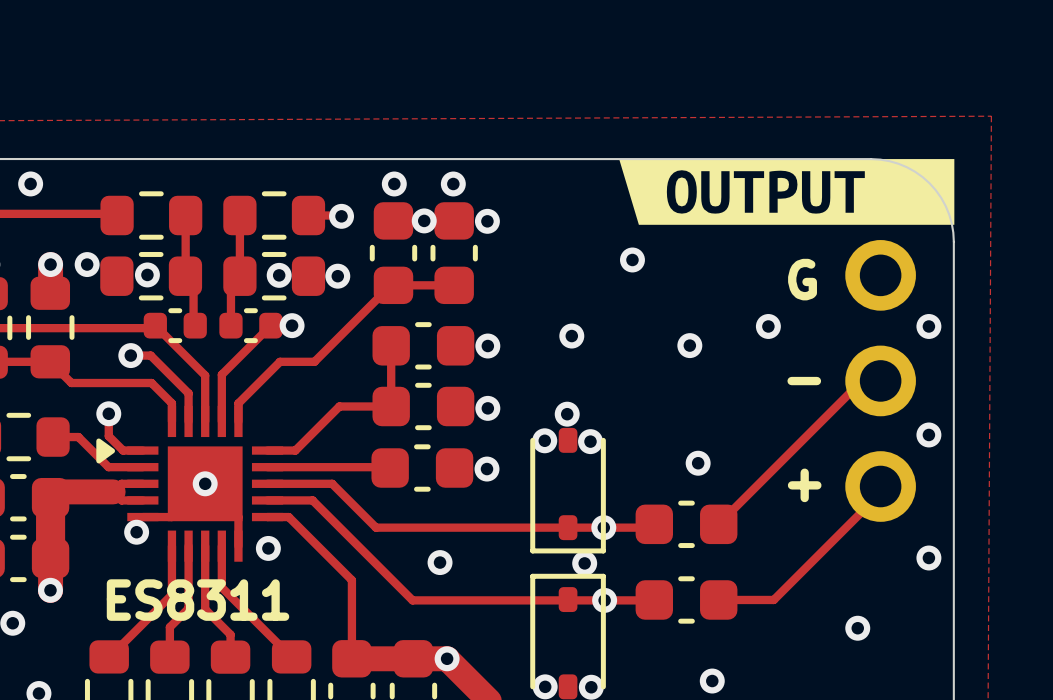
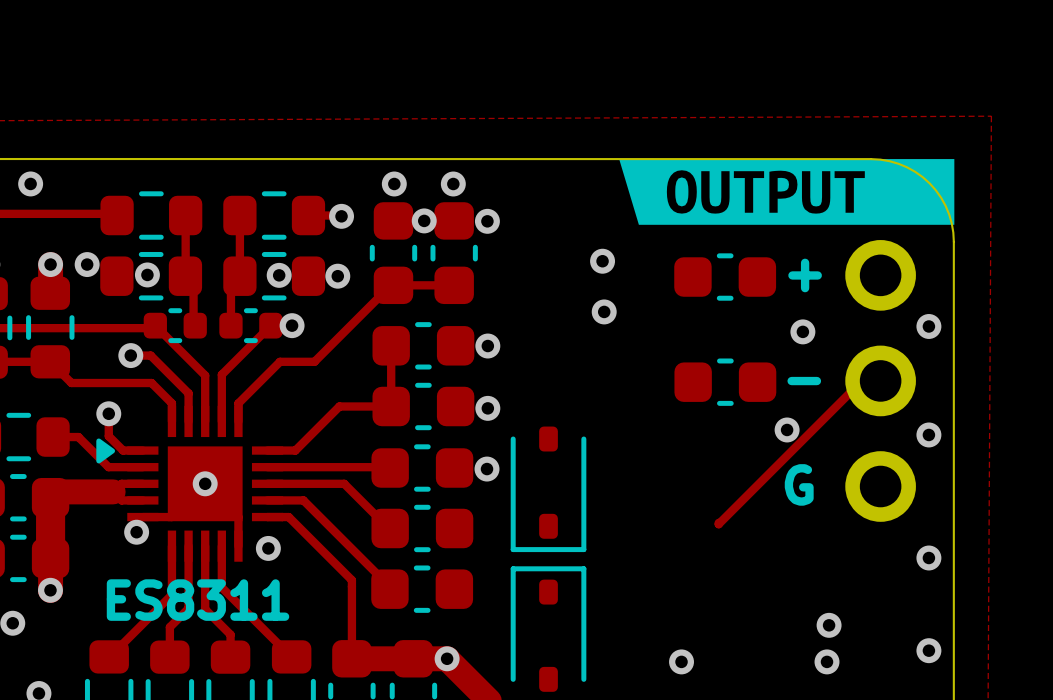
via: (632, 259) -> none
via: none -> (602, 261)
part: none -> (725, 277)
text position: G (802, 279) -> G (799, 484)
via: none -> (604, 311)
via position: (768, 326) -> (802, 331)
via: (571, 336) -> none
via: (689, 345) -> none
part: none -> (725, 382)
via: (567, 414) -> none
via: none -> (787, 429)
via: (544, 440) -> none
via: (590, 441) -> none
via: (698, 463) -> none
track: (332, 483) (376, 527) (650, 527) (654, 524) -> (332, 483) (344, 483) (390, 528)
text position: + (804, 485) -> + (805, 275)
part position: (568, 490) -> (548, 489)
track: (880, 493) (773, 599) (718, 599) -> none
track: (303, 500) (312, 500) (412, 600) (653, 600) -> (303, 500) (389, 586) (389, 589)
part: (686, 524) -> none
via: (603, 527) -> none
part: none -> (422, 528)
via: (440, 562) -> none
via: (584, 563) -> none
part: none -> (422, 589)
part: (686, 599) -> none
via: (604, 600) -> none
via: none -> (829, 625)
via: (857, 628) -> none
part position: (568, 636) -> (548, 629)
via: none -> (928, 650)
via: none -> (826, 661)
via position: (712, 681) -> (681, 661)
via: (545, 686) -> none
via: (591, 687) -> none

